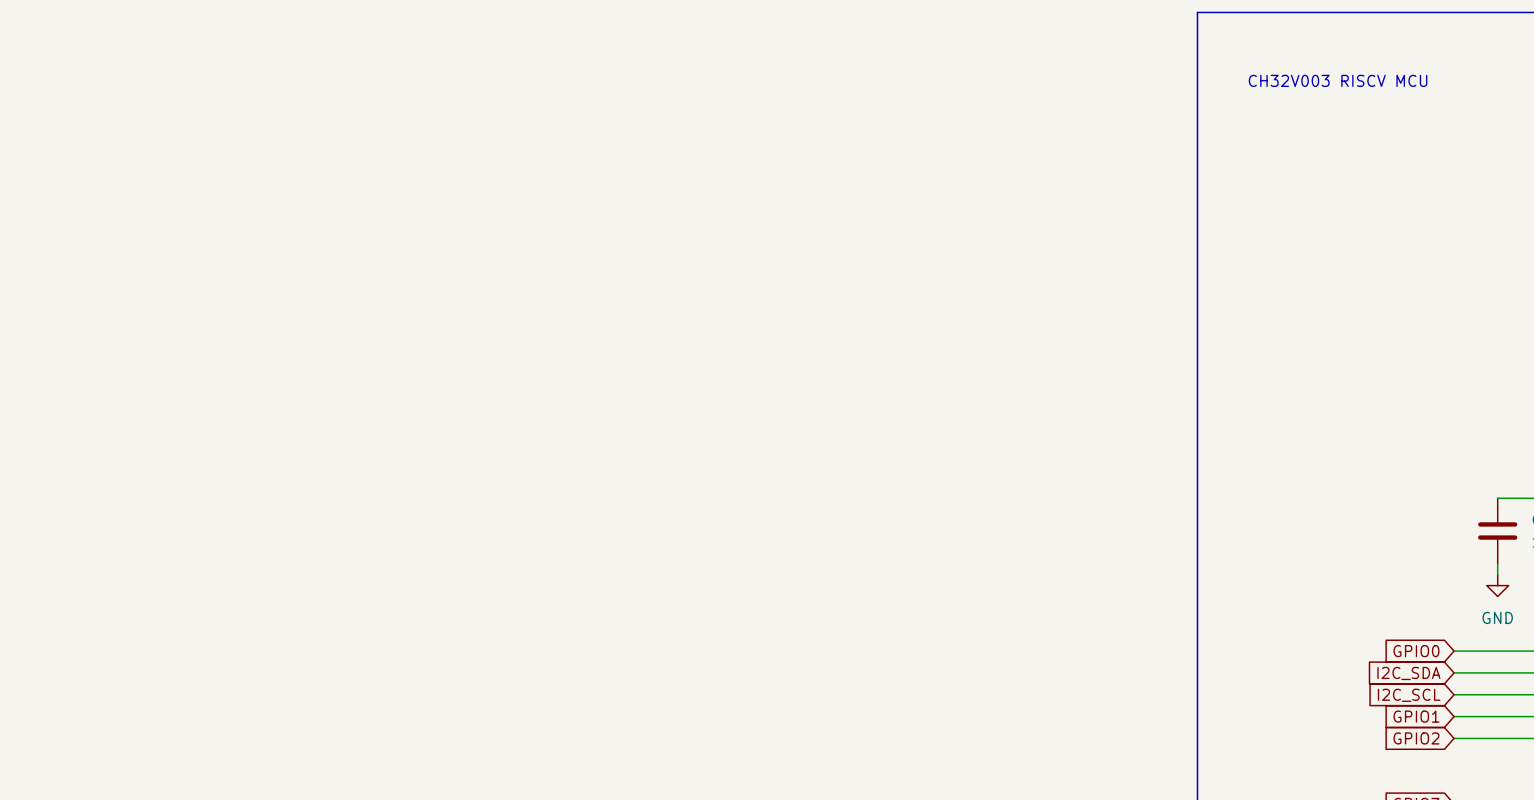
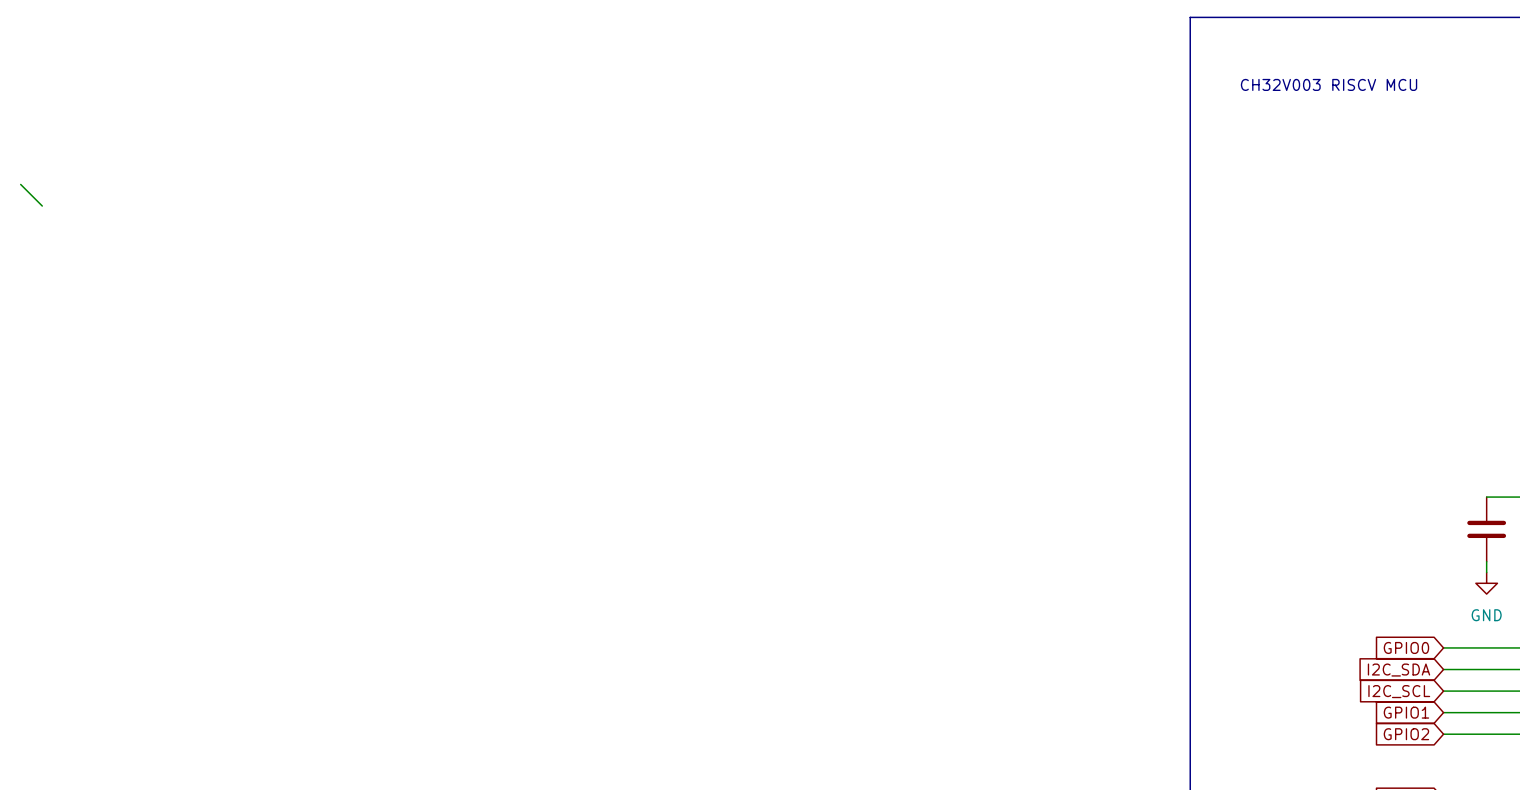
wire: none -> (20, 184) (42, 206)

